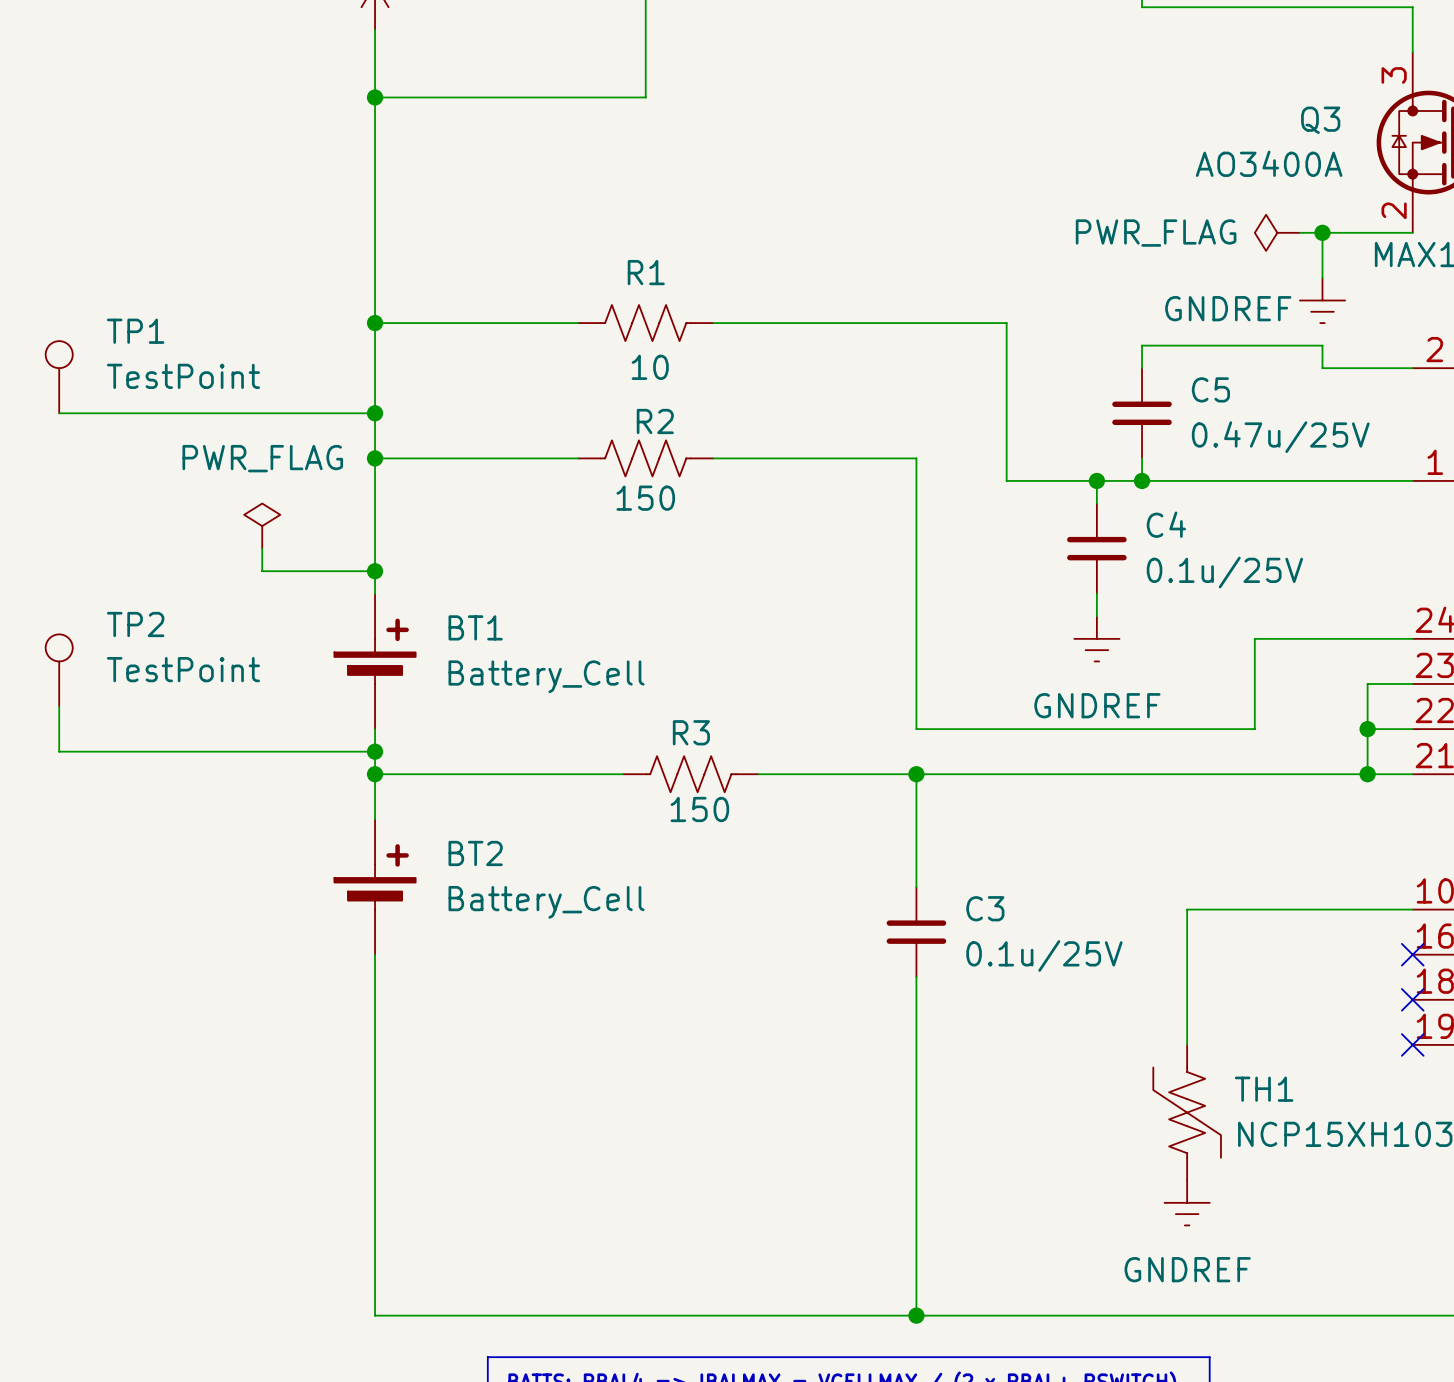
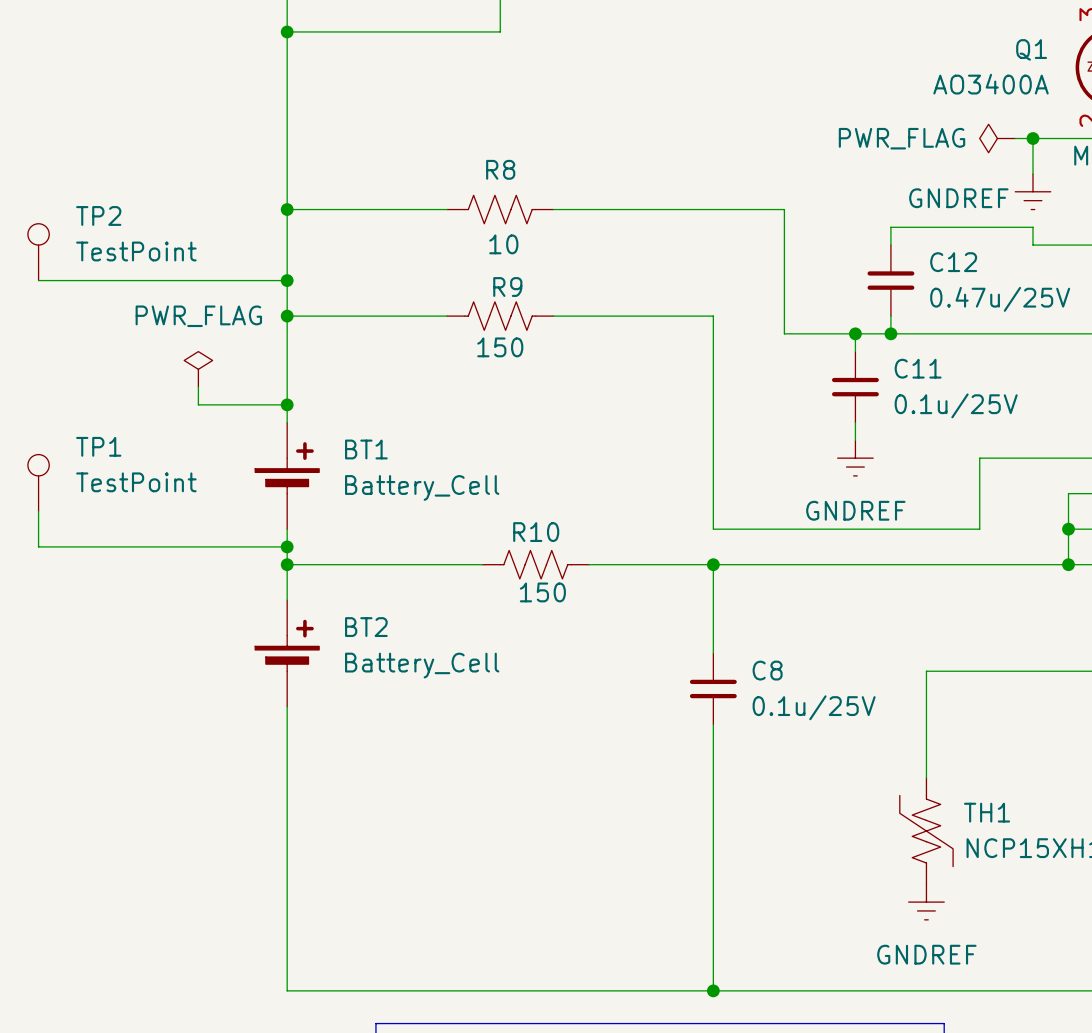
Q3 name: Q3 (1320, 120) -> Q1 (1031, 49)
R1 name: R1 (646, 272) -> R8 (500, 169)
TP1 name: TP1 (135, 331) -> TP2 (98, 215)
C5 name: C5 (1210, 389) -> C12 (953, 262)
R2 name: R2 (655, 421) -> R9 (507, 287)
C4 name: C4 (1166, 524) -> C11 (918, 368)
TP2 name: TP2 (135, 624) -> TP1 (98, 446)
R3 name: R3 (691, 732) -> R10 (536, 532)
C3 name: C3 (985, 908) -> C8 (767, 670)

